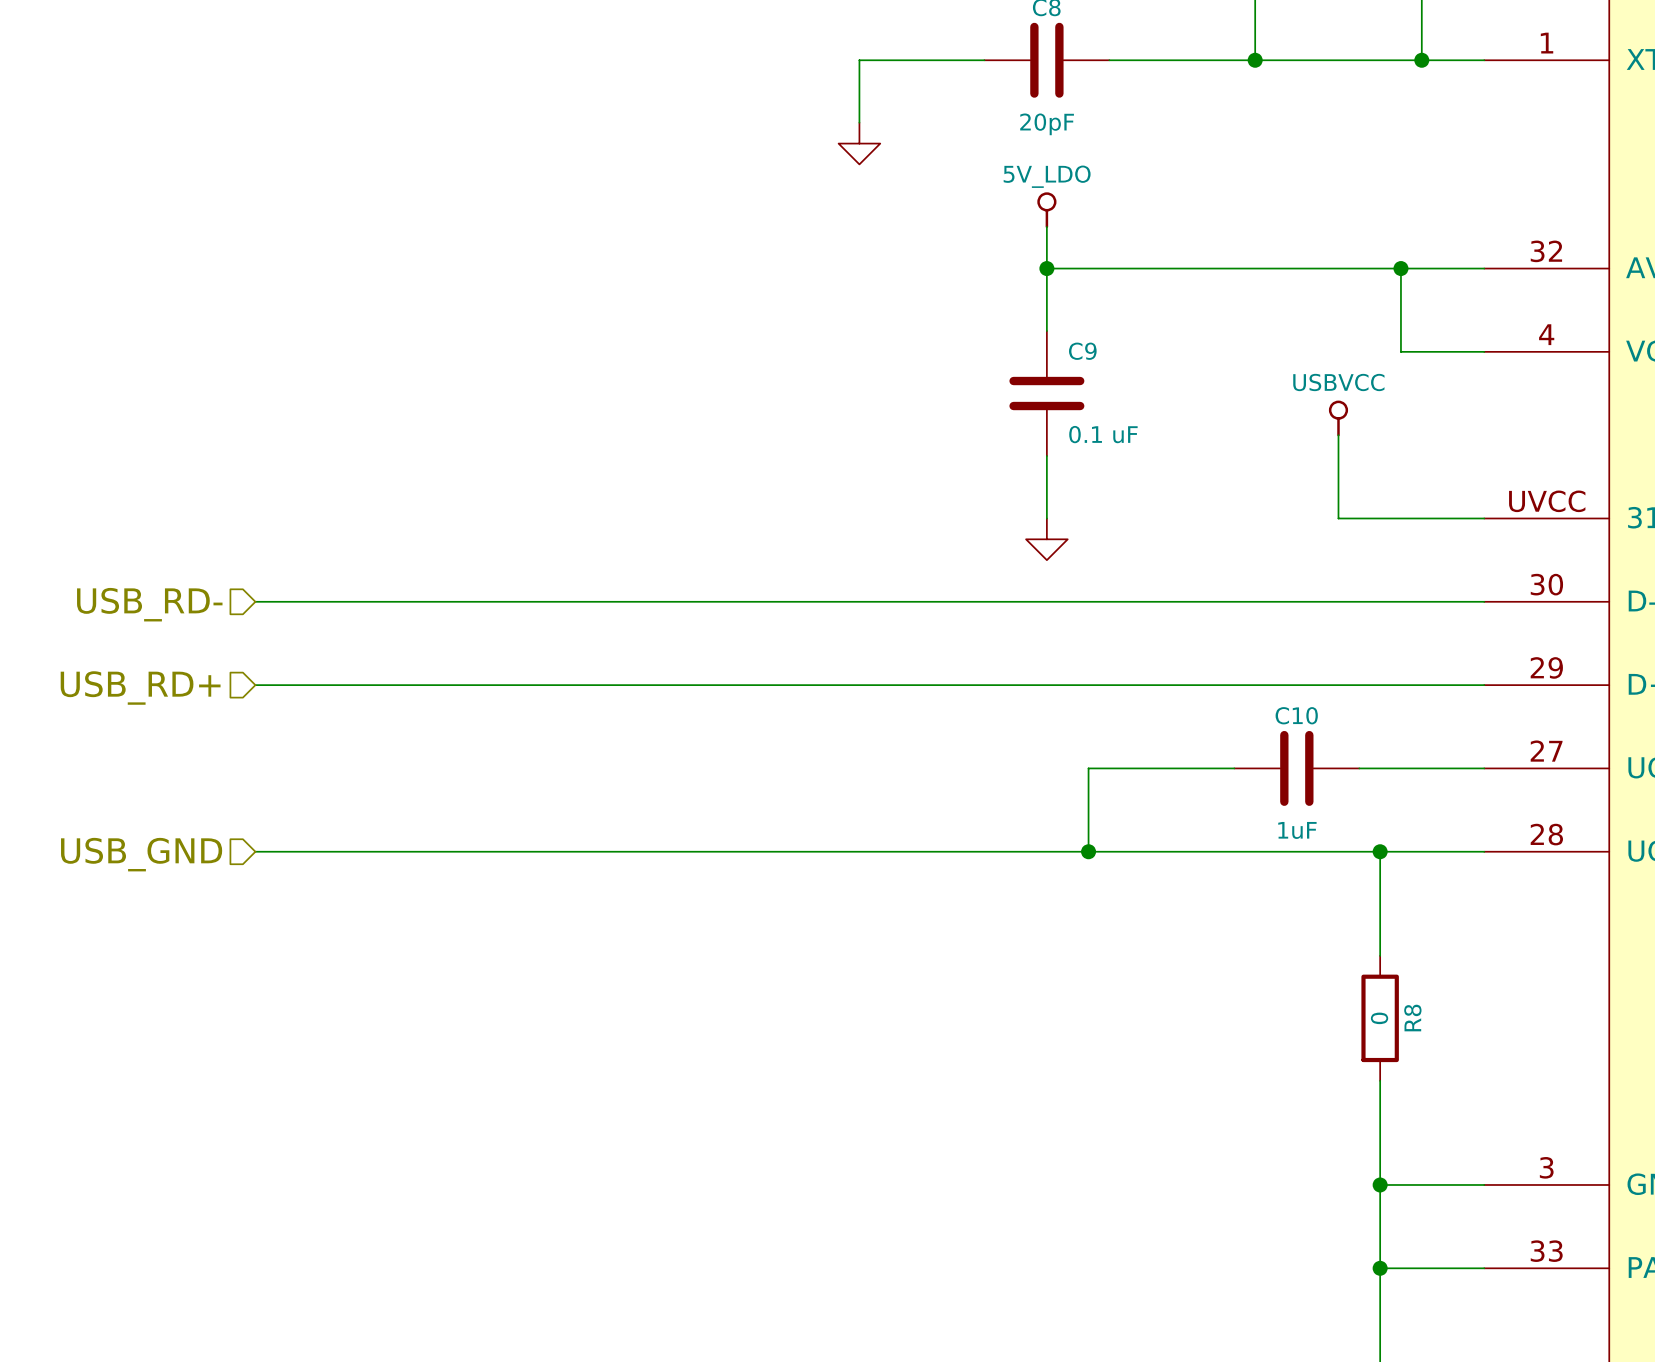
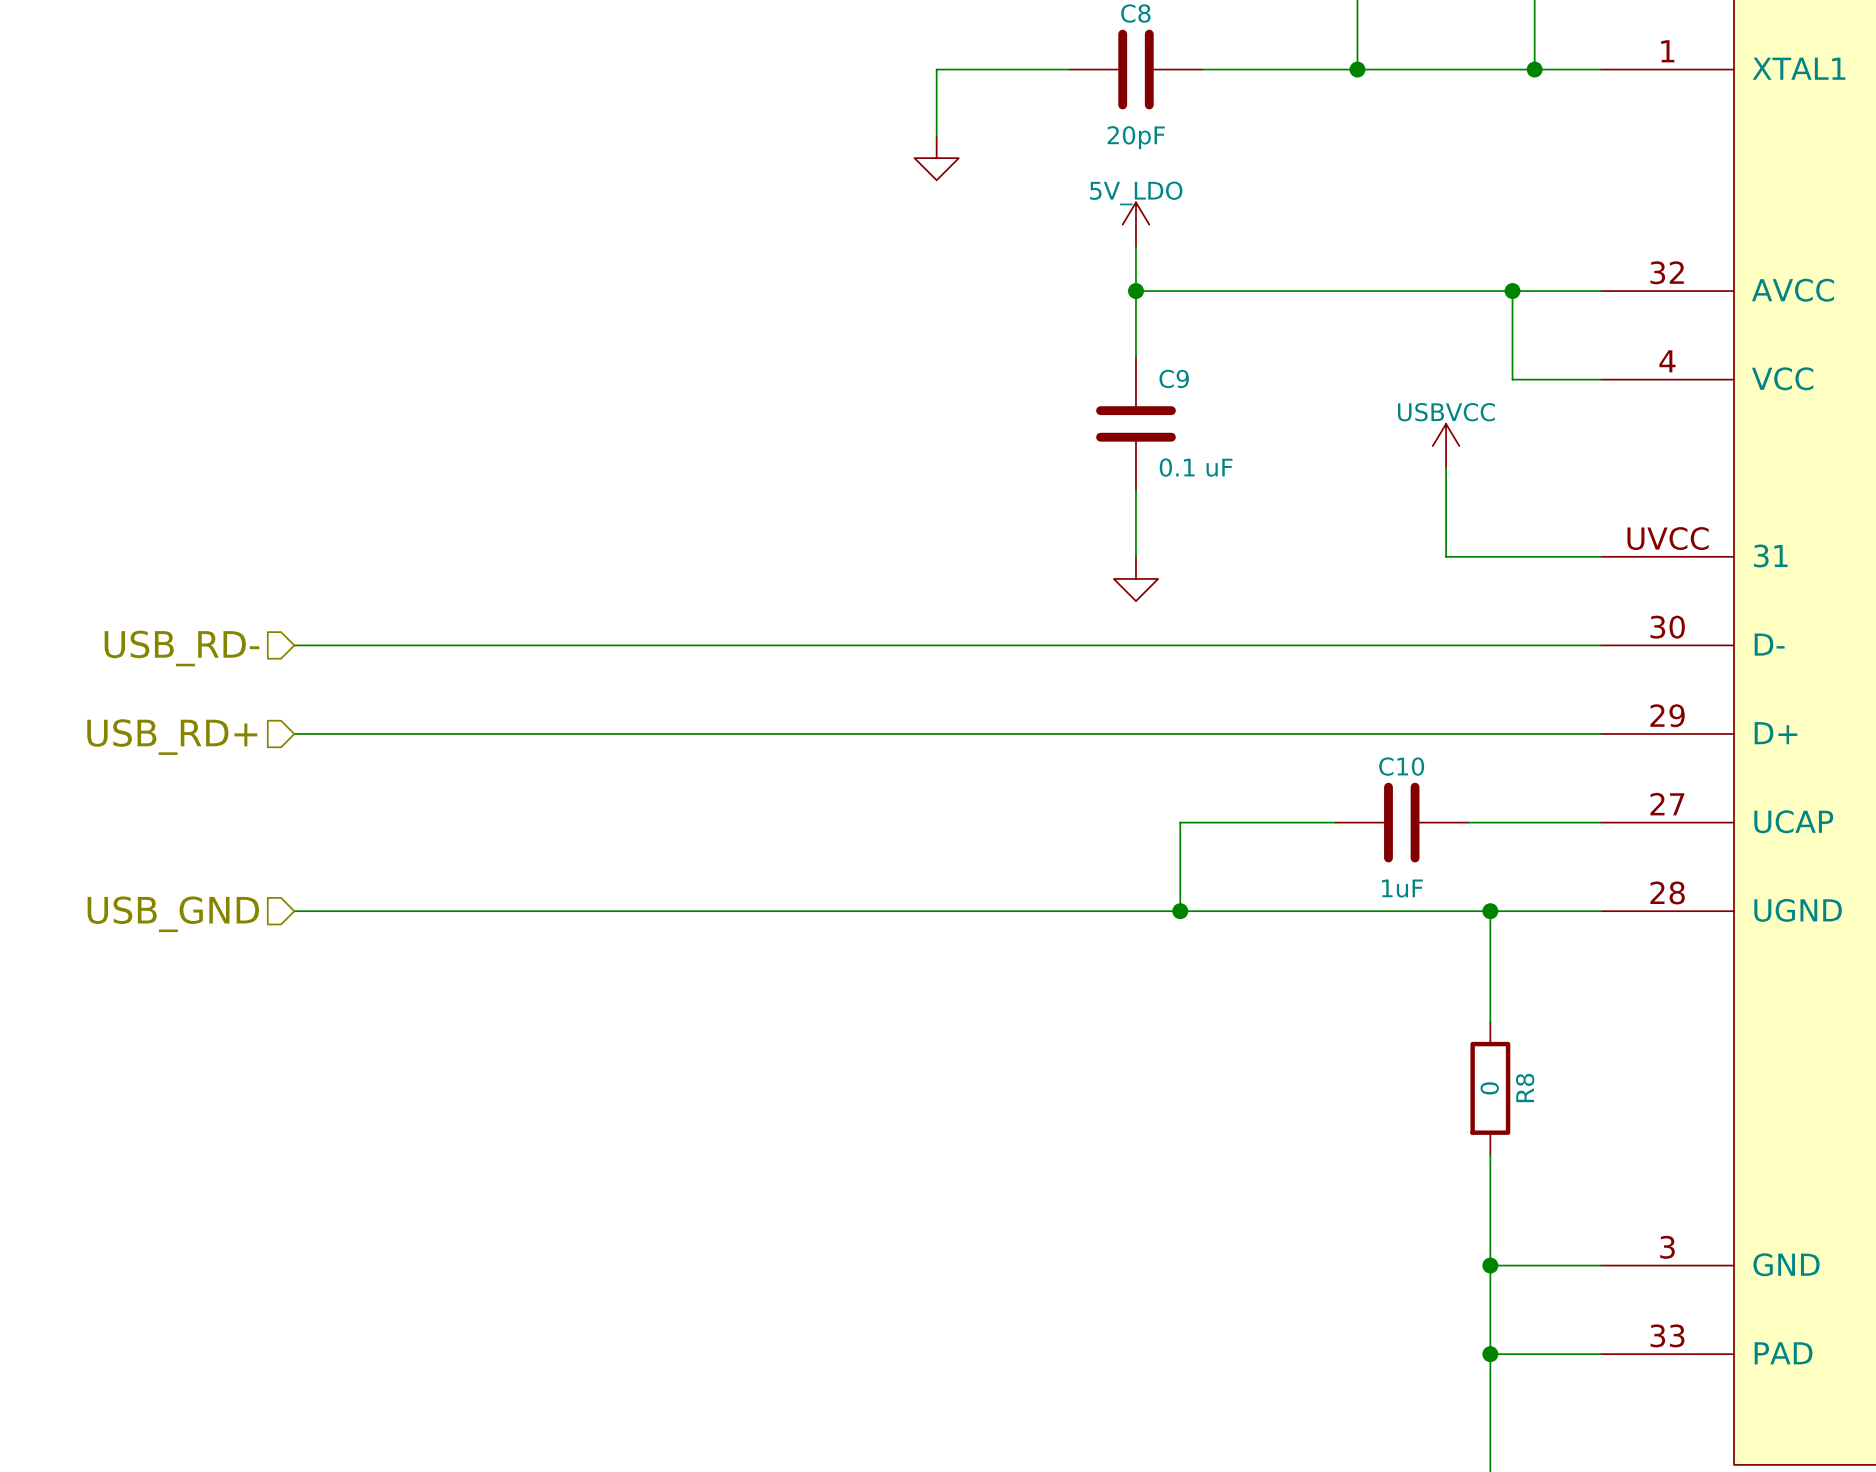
power symbol shape: [1037, 192, 1057, 229] -> [1122, 202, 1150, 247]
power symbol shape: [1328, 400, 1349, 437] -> [1432, 423, 1460, 469]

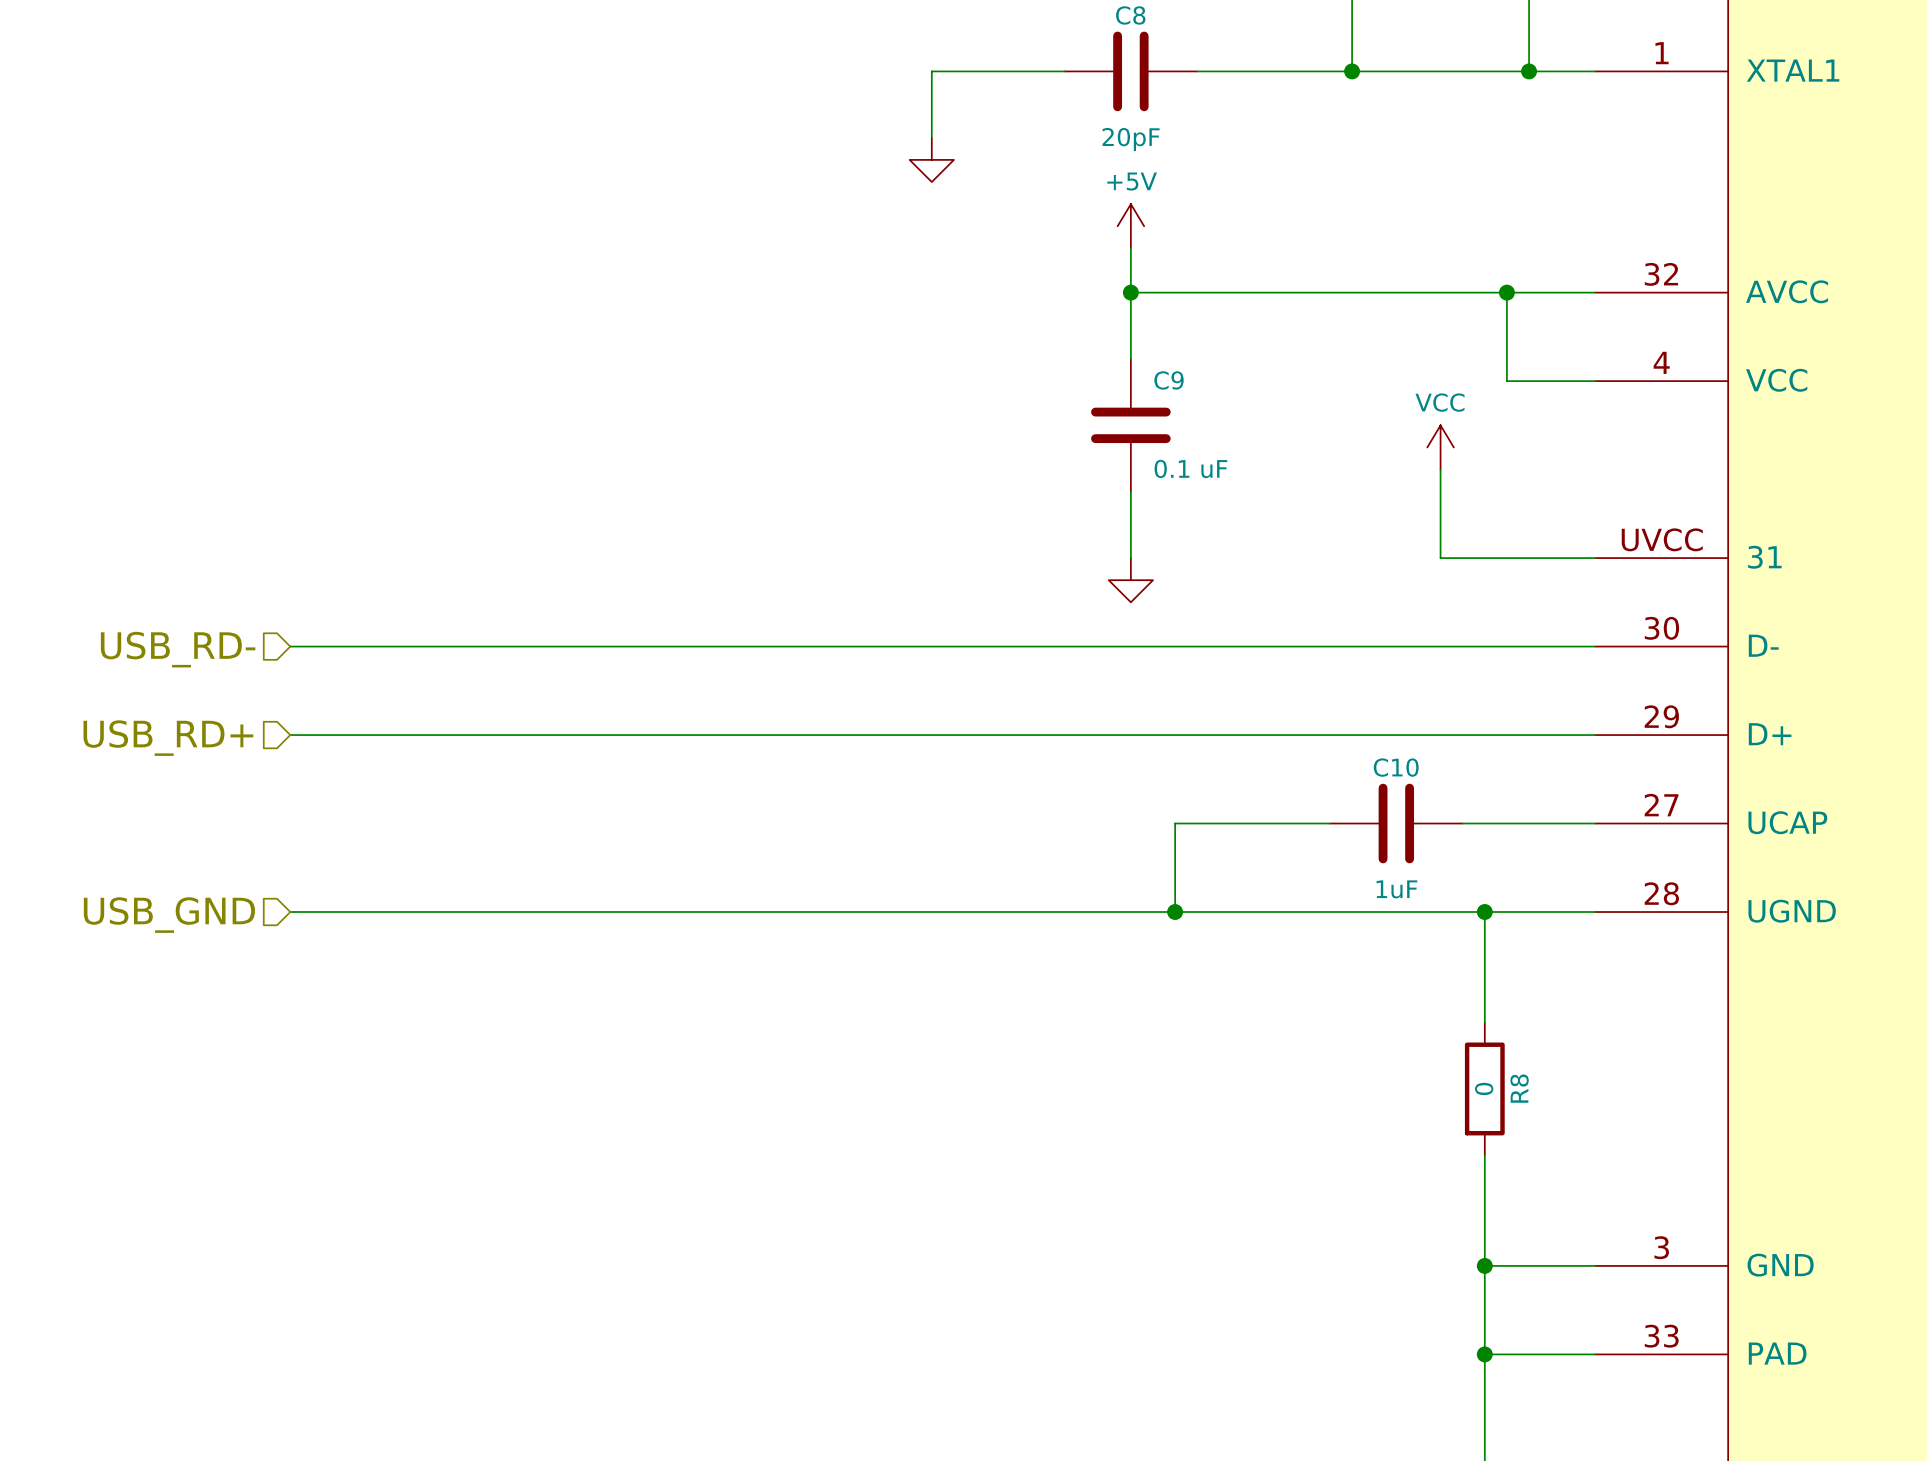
power symbol: 5V_LDO (1135, 224) -> +5V (1130, 226)
power symbol: USBVCC (1446, 446) -> VCC (1440, 447)

